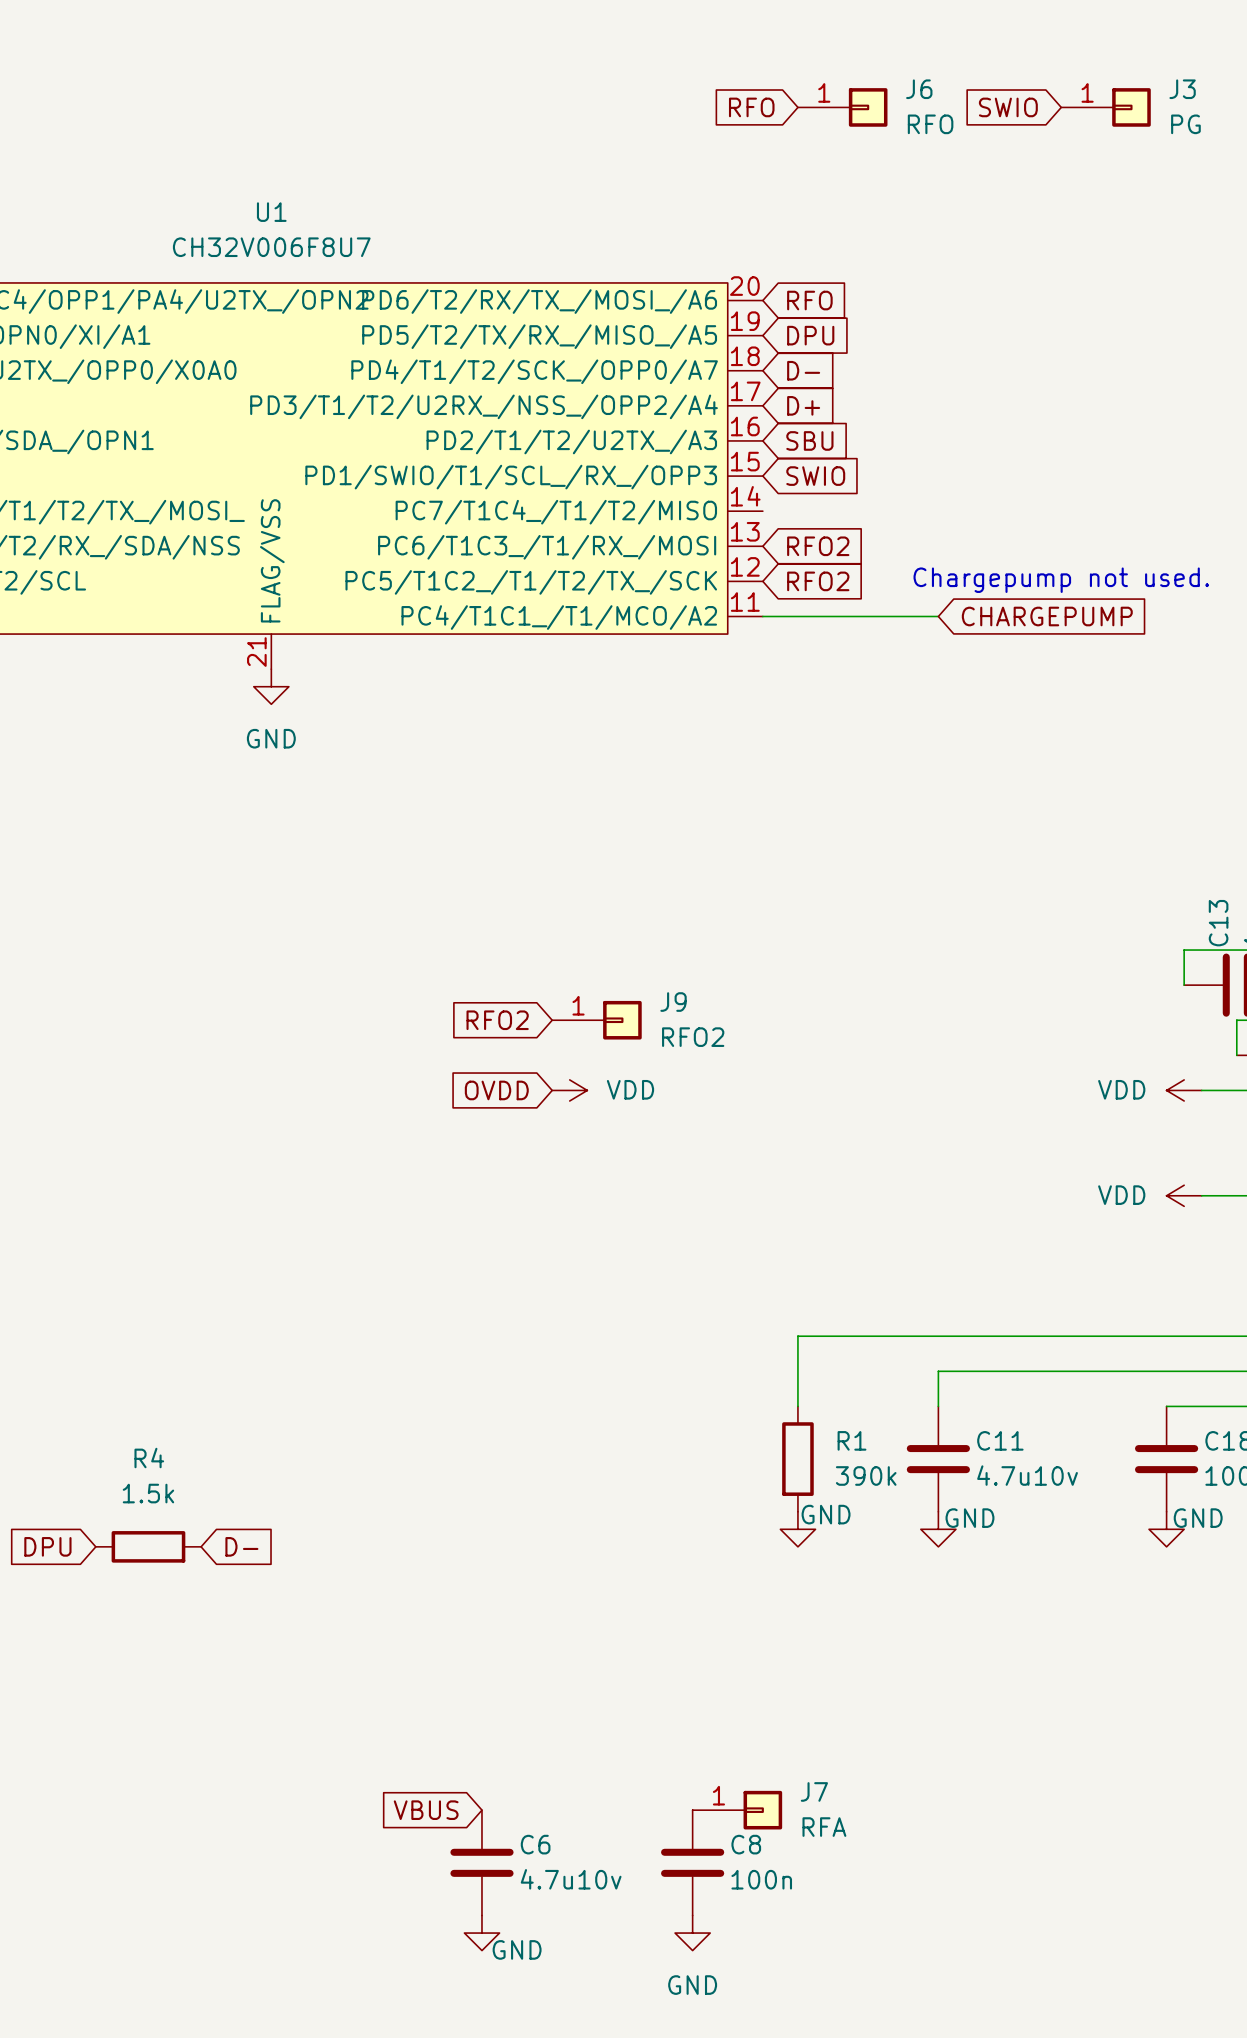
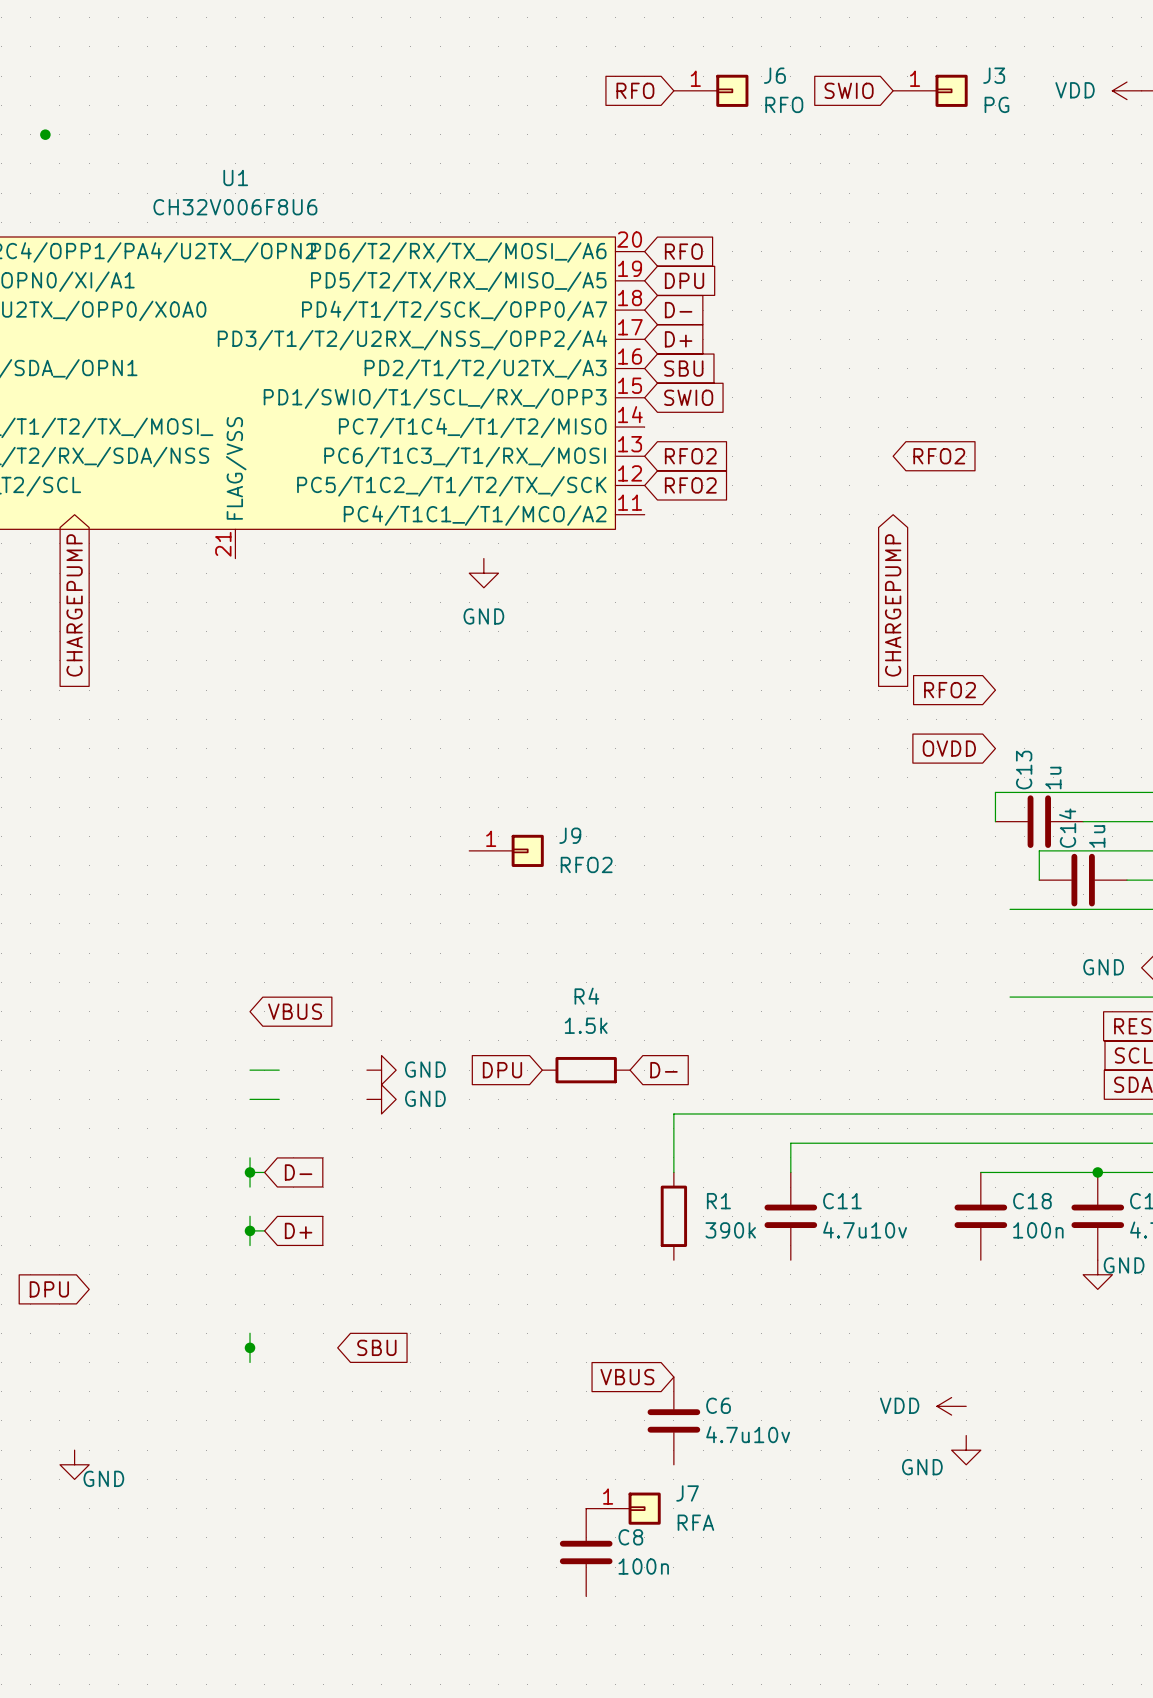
junction: none -> (45, 134)
U1 value: CH32V006F8U7 (271, 247) -> CH32V006F8U6 (235, 207)
global label: none -> RFO2 (939, 456)
text: Chargepump not used. (1061, 580) -> none
wire: (762, 616) (938, 616) -> none
global label rotation: 0° (1047, 616) -> 90° clockwise (893, 605)
power symbol: GND (271, 686) -> none
power symbol: none -> GND (483, 573)
global label: none -> CHARGEPUMP (74, 605)
global label: none -> RFO2 (950, 690)
global label: none -> OVDD (949, 748)
global label: RFO2 (497, 1020) -> none
global label: OVDD (496, 1090) -> none
power symbol: VDD (569, 1090) -> none
power symbol: VDD (1184, 1090) -> none
power symbol: VDD (1184, 1195) -> none
global label: none -> VBUS (295, 1011)
wire: none -> (250, 1070) (279, 1070)
power symbol: none -> GND (381, 1070)
global label: none -> DPU (502, 1070)
global label: none -> D- (663, 1070)
wire: none -> (250, 1099) (279, 1099)
power symbol: none -> GND (381, 1099)
wire: none -> (250, 1157) (250, 1187)
wire: none -> (250, 1172) (264, 1172)
junction: none -> (250, 1172)
wire: none -> (250, 1216) (250, 1245)
wire: none -> (250, 1230) (264, 1230)
junction: none -> (250, 1230)
global label: none -> D+ (298, 1230)
power symbol: GND (797, 1529) -> none
power symbol: GND (938, 1529) -> none
power symbol: GND (1166, 1529) -> none
R4 position: (148, 1546) -> (586, 1070)
global label position: D- (241, 1546) -> D- (298, 1172)
wire: none -> (250, 1333) (250, 1362)
junction: none -> (250, 1347)
global label: none -> SBU (376, 1347)
global label: none -> VBUS (627, 1377)
power symbol: none -> VDD (951, 1406)
power symbol: none -> GND (966, 1450)
power symbol: none -> GND (74, 1464)
global label: VBUS (426, 1810) -> none
C6 position: (481, 1862) -> (673, 1420)
power symbol: GND (481, 1933) -> none
power symbol: GND (692, 1933) -> none

